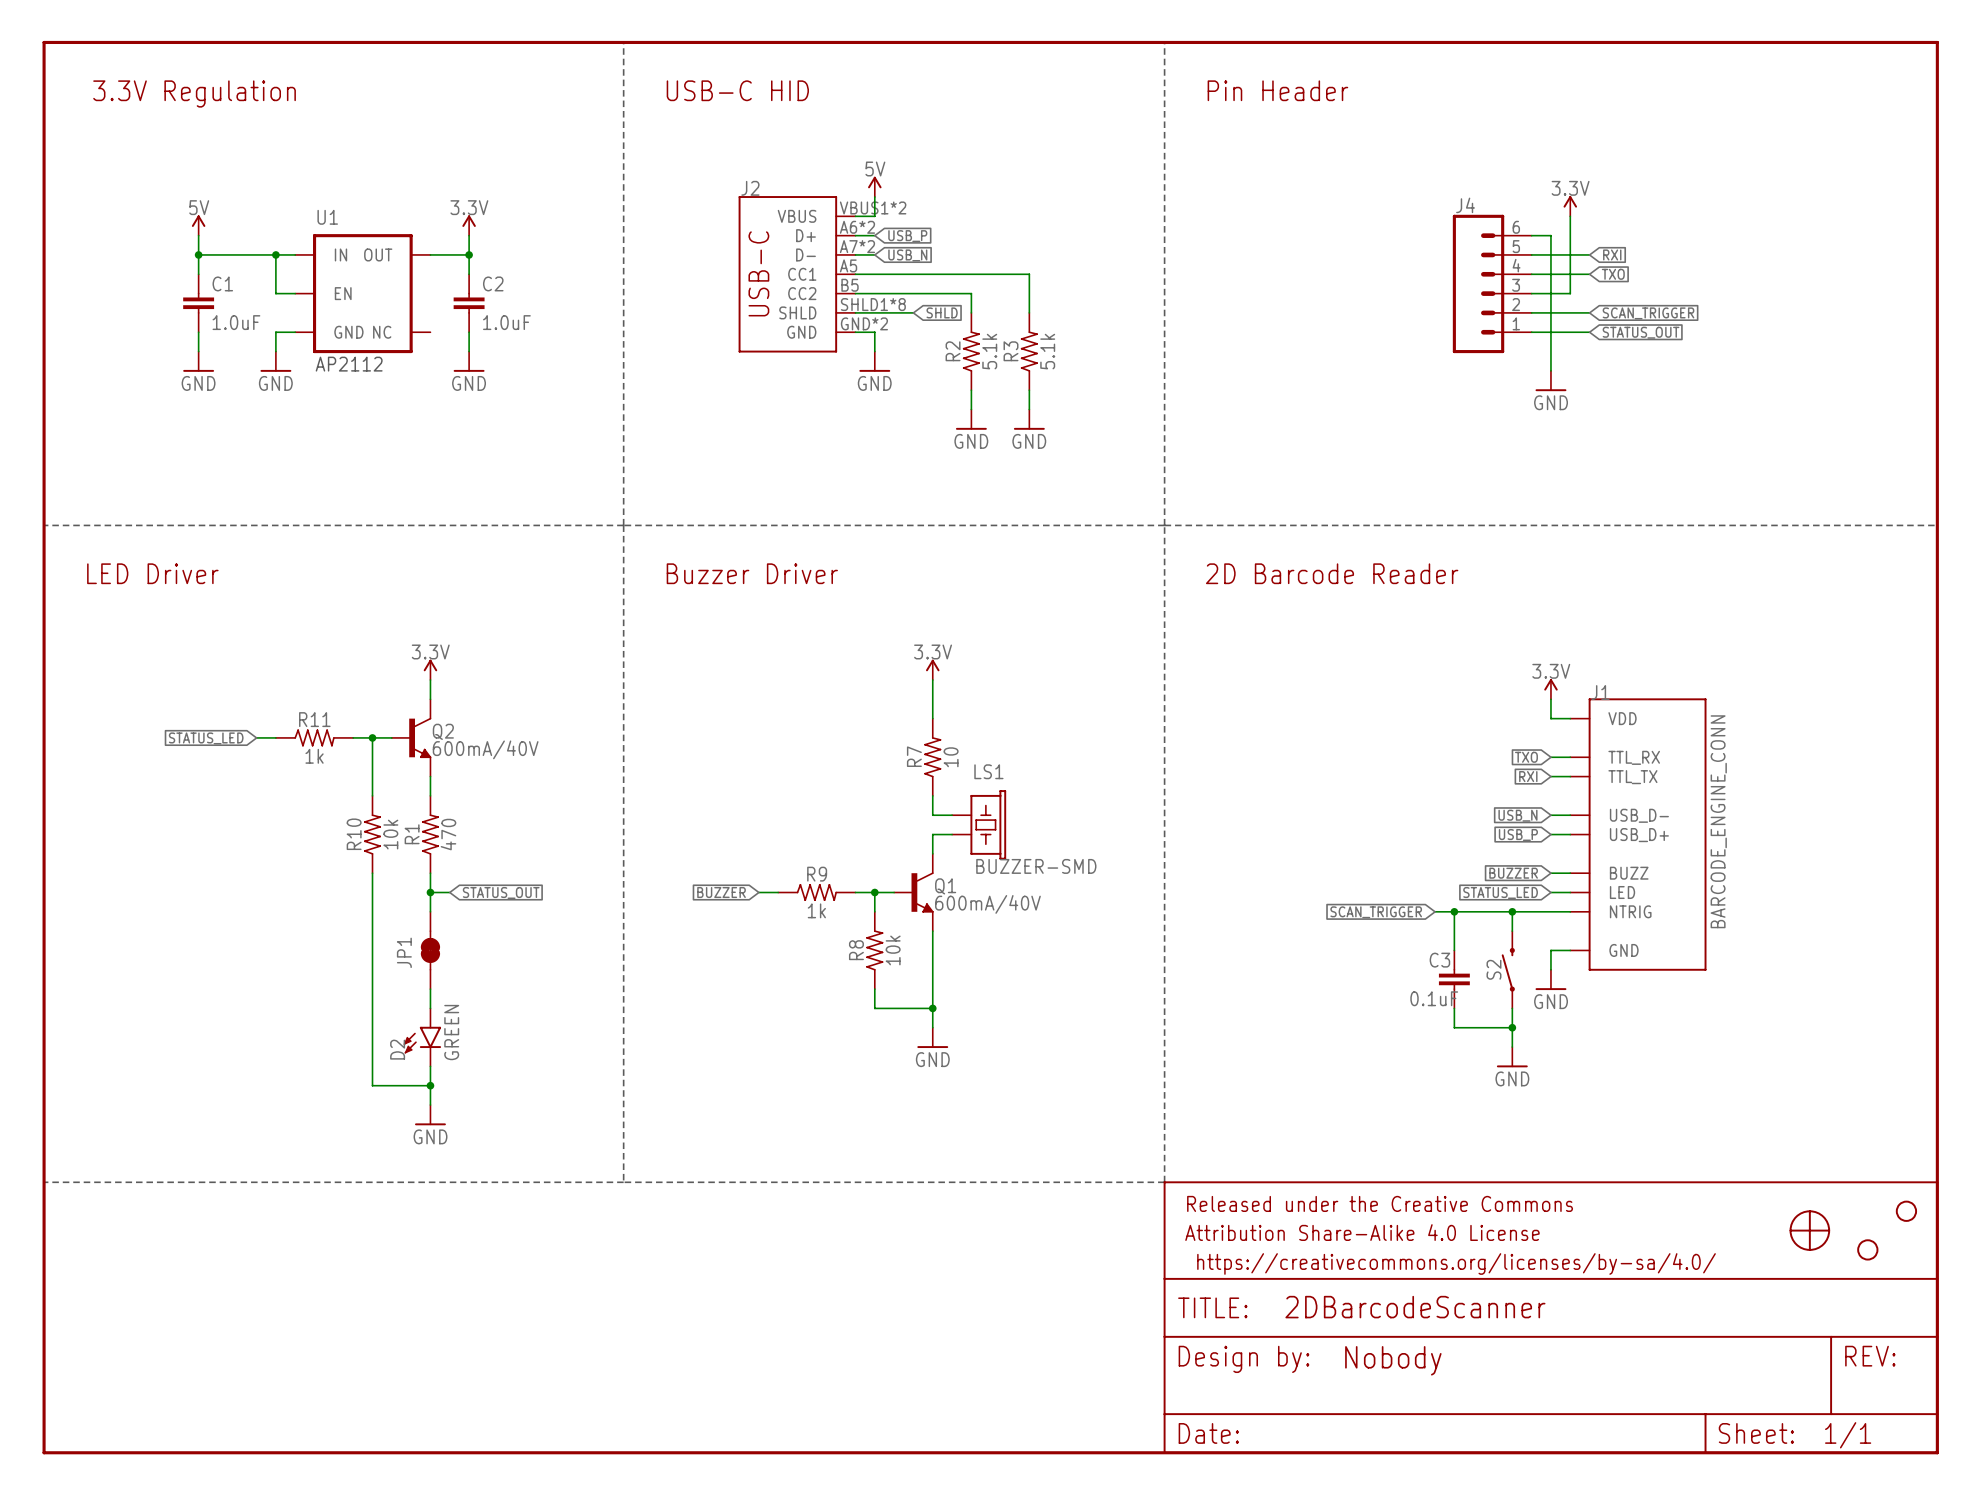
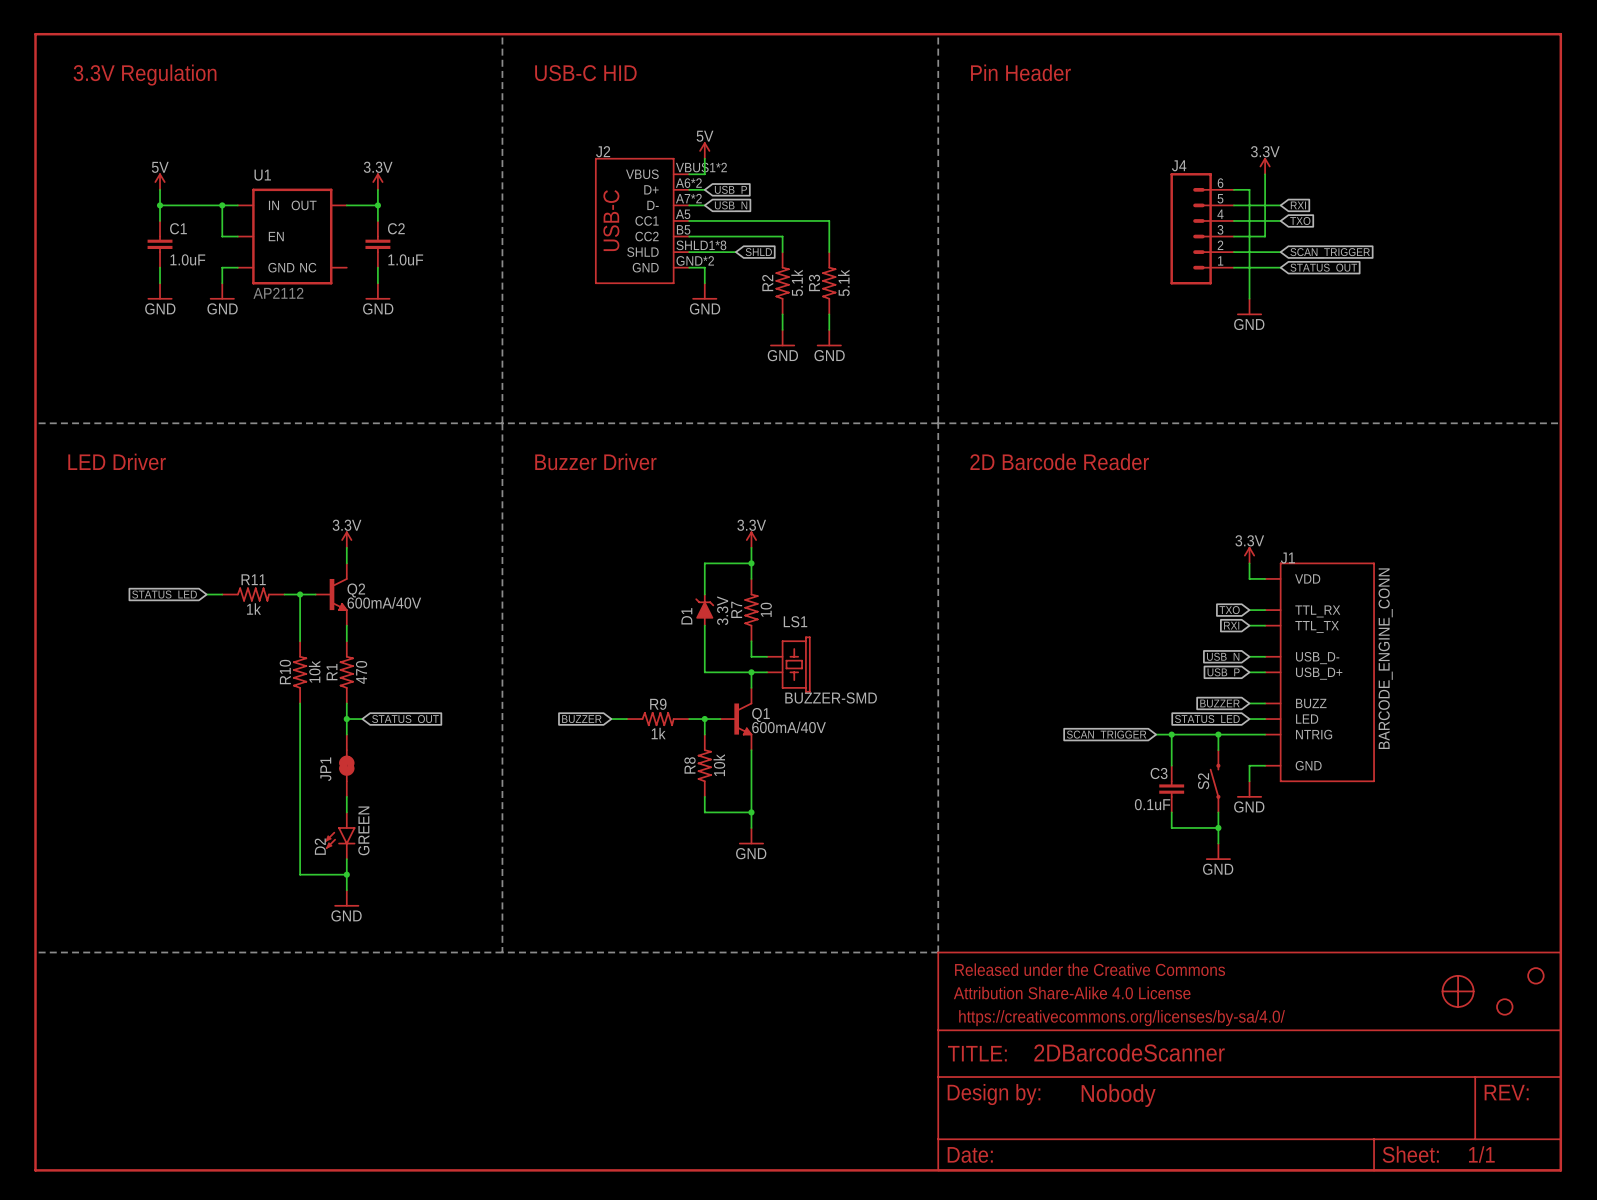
wire: none -> (751, 563) (704, 563) (704, 594)
junction: none -> (751, 563)
D1: none -> 3.3V (704, 610)
wire: none -> (704, 625) (704, 672) (751, 672)
junction: none -> (751, 672)

